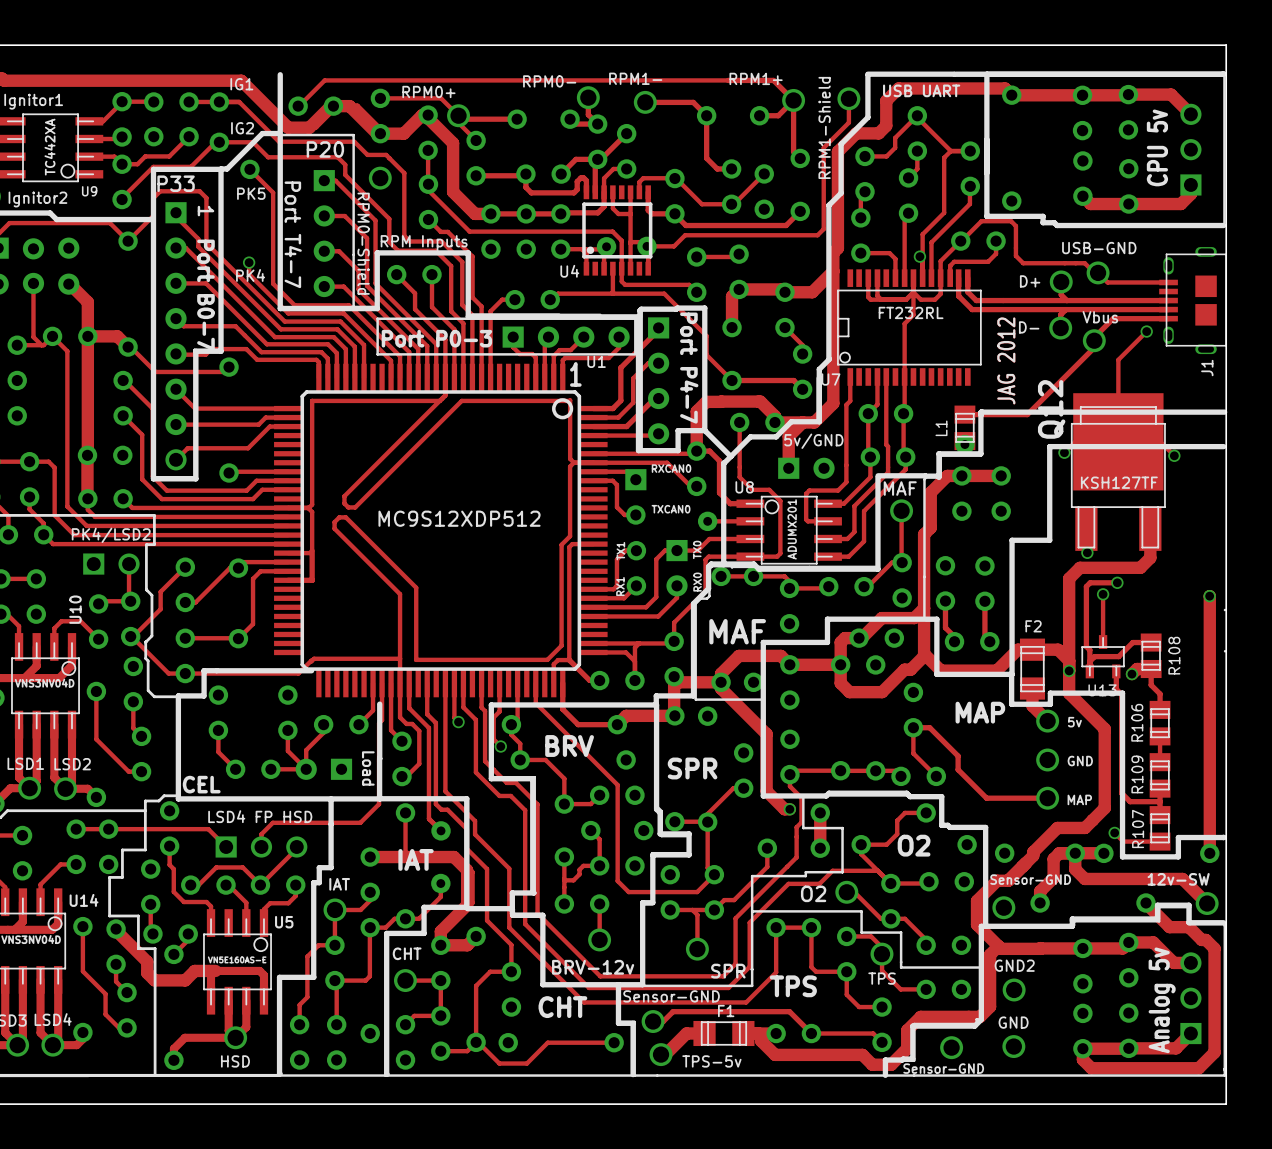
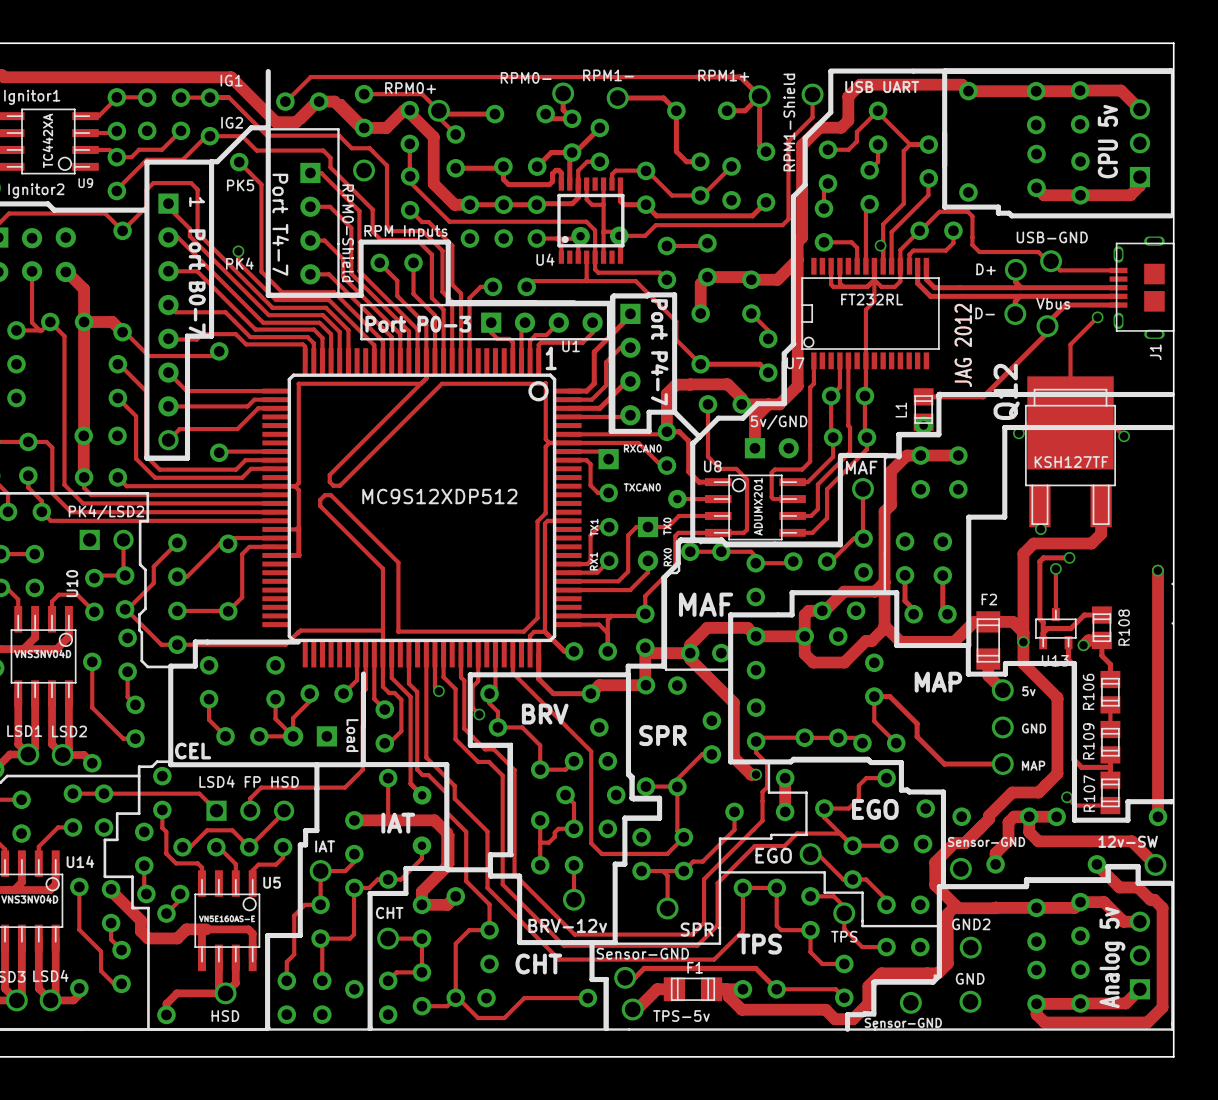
text: P20 (325, 149) -> none
text: P33 (176, 183) -> none
text: O2 (914, 845) -> EGO (875, 809)
text: O2 (813, 893) -> EGO (773, 855)

